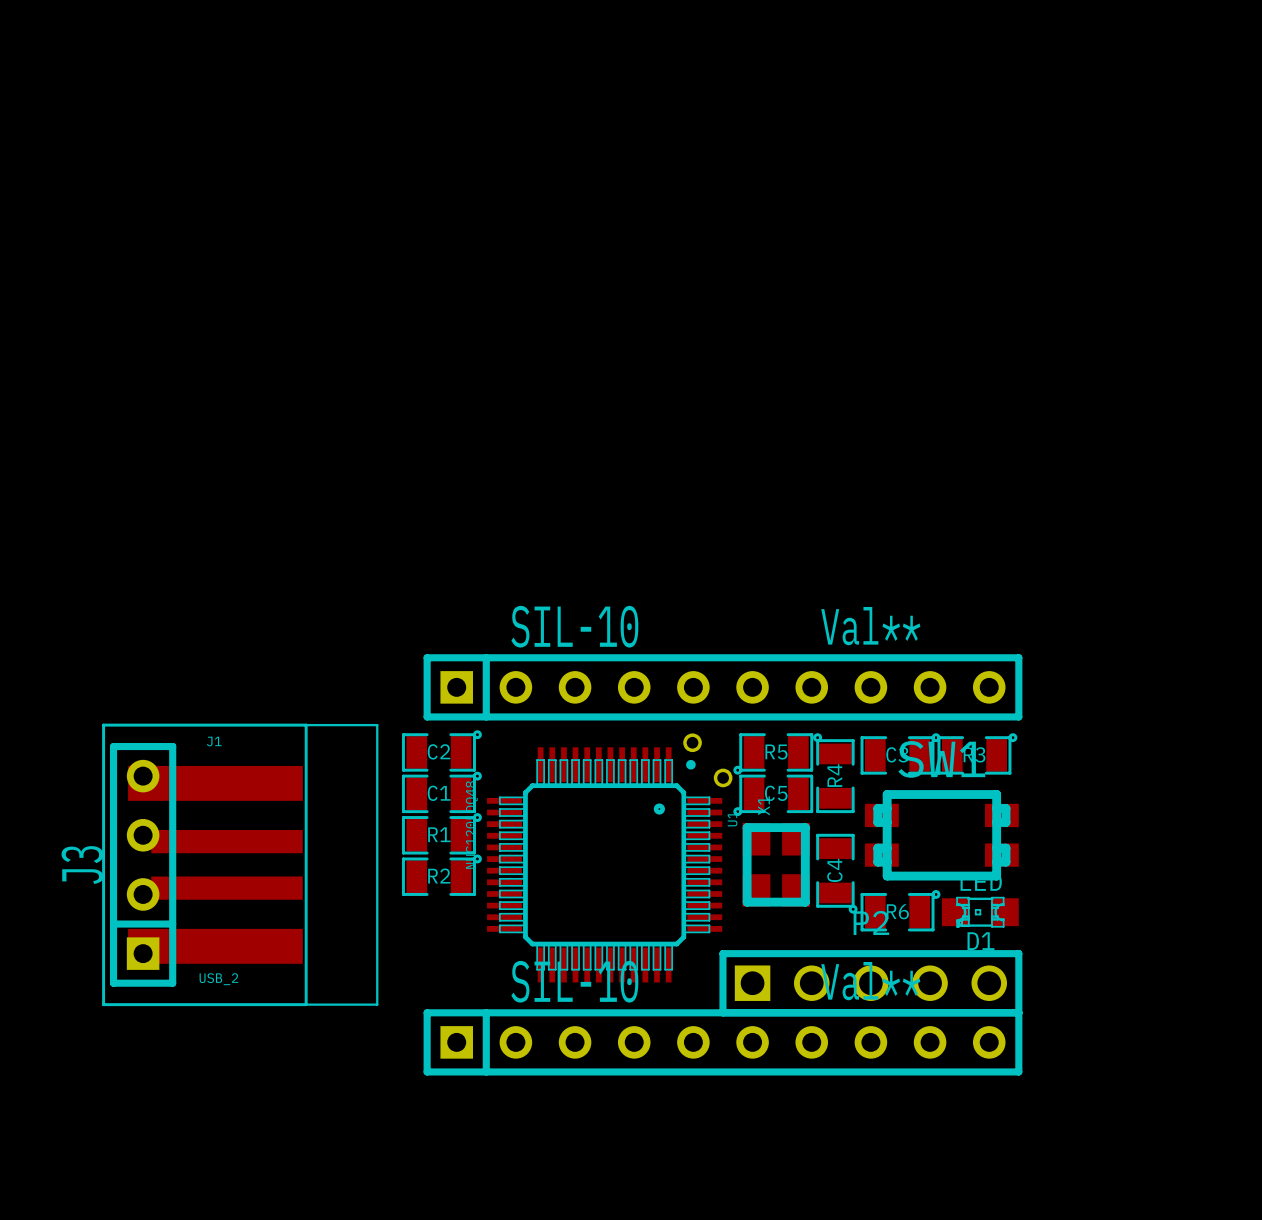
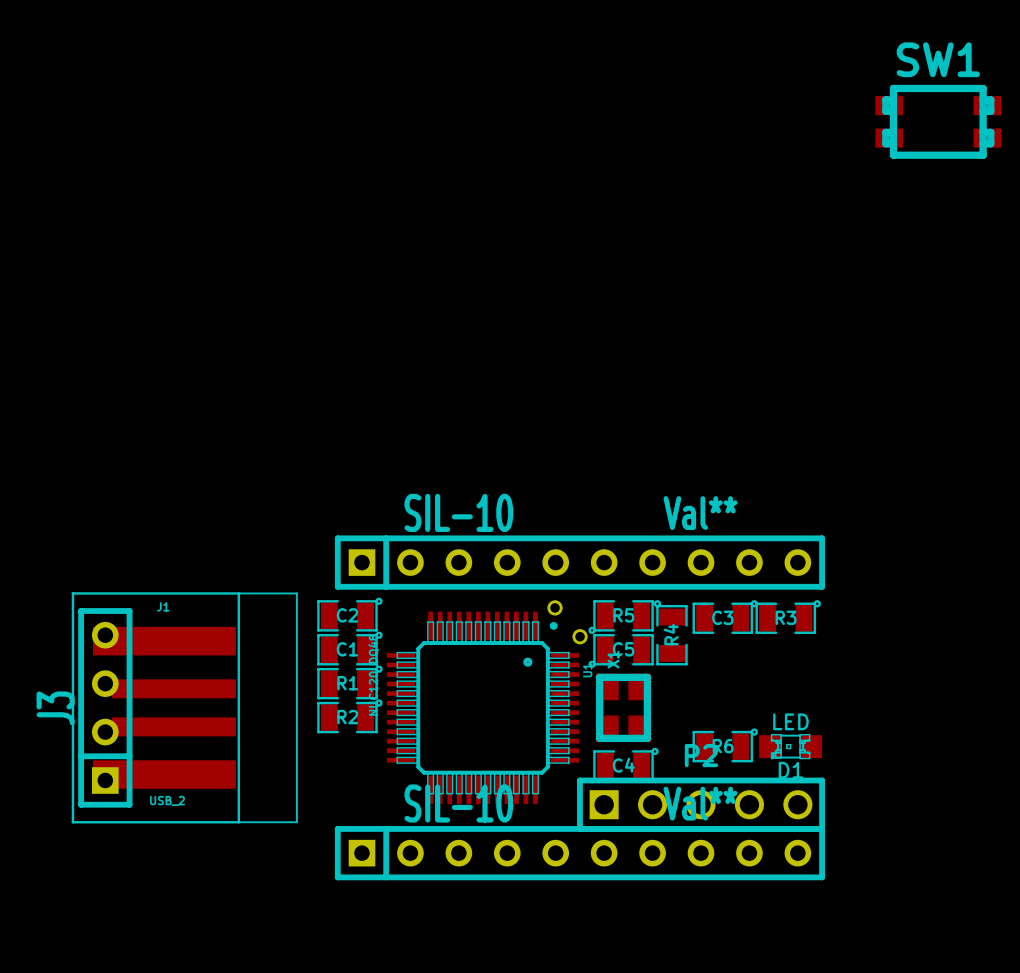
SW1 position: (941, 835) -> (938, 121)
C4 rotation: 0° (836, 873) -> 90° counterclockwise (625, 764)
C4 position: (836, 873) -> (625, 764)

